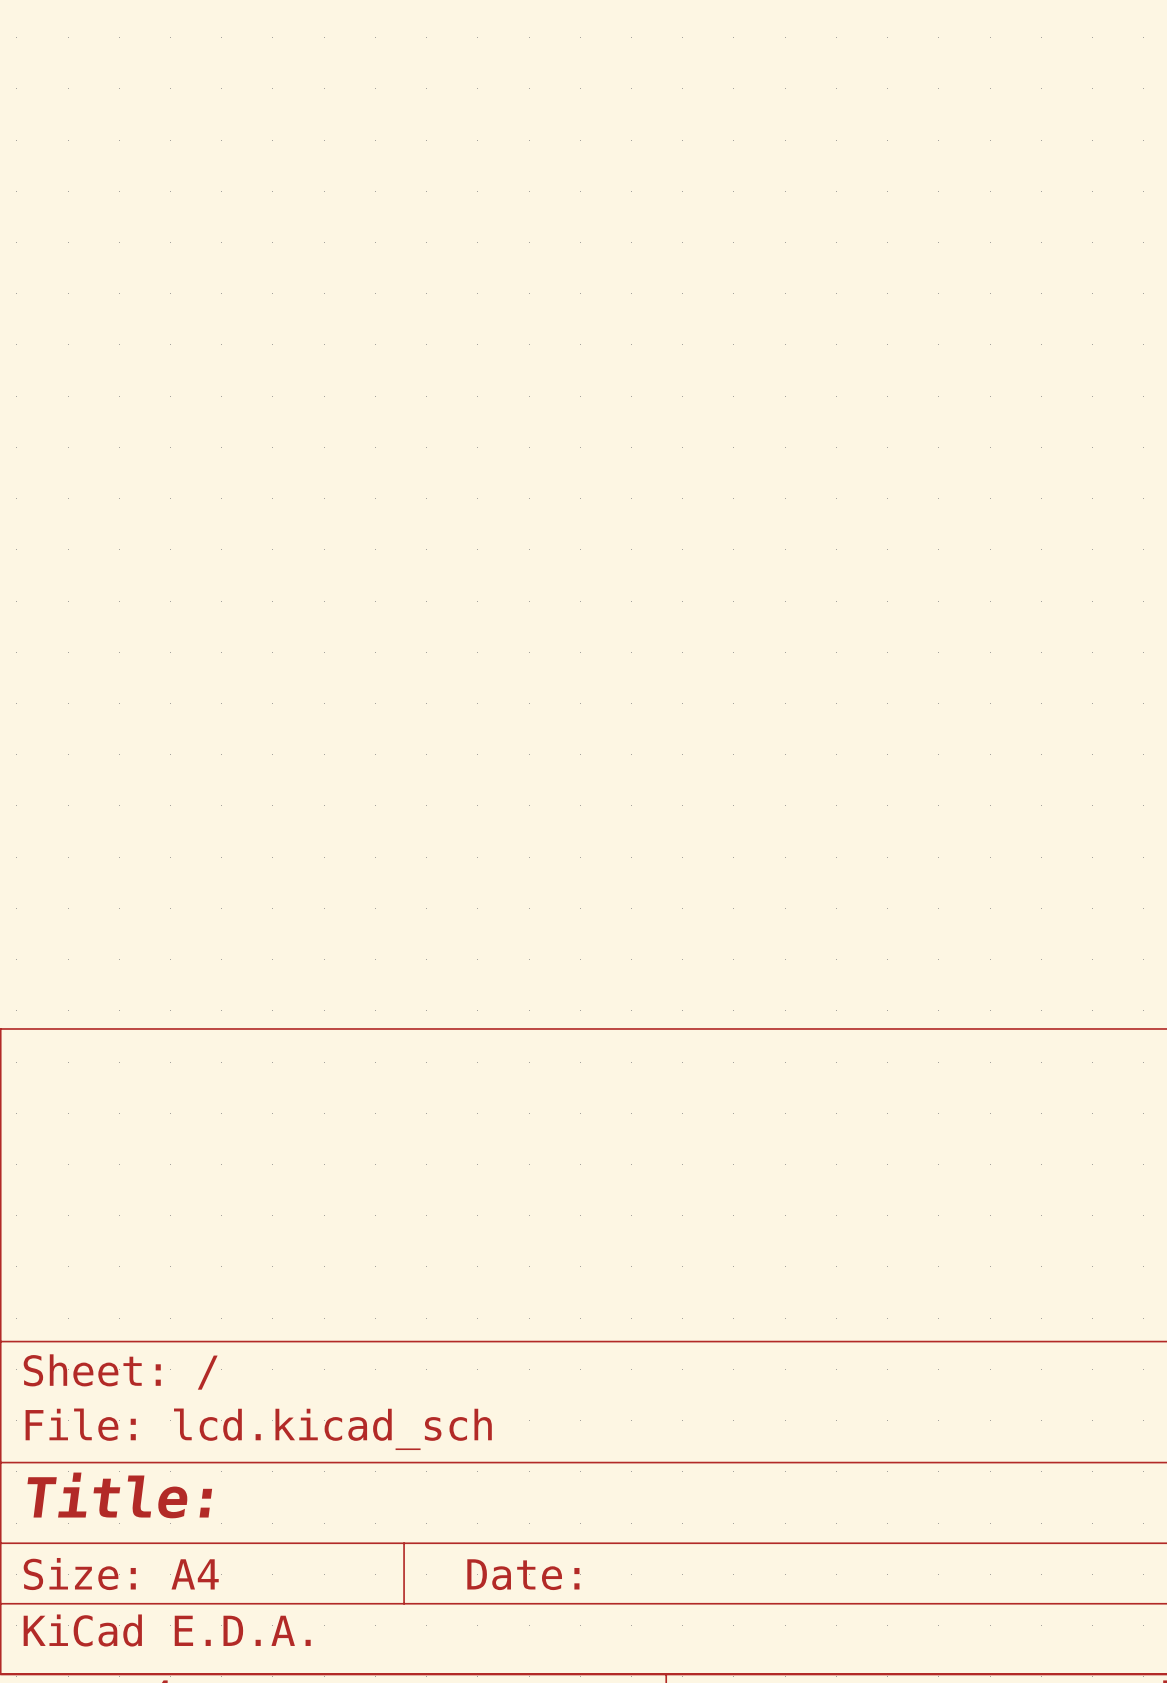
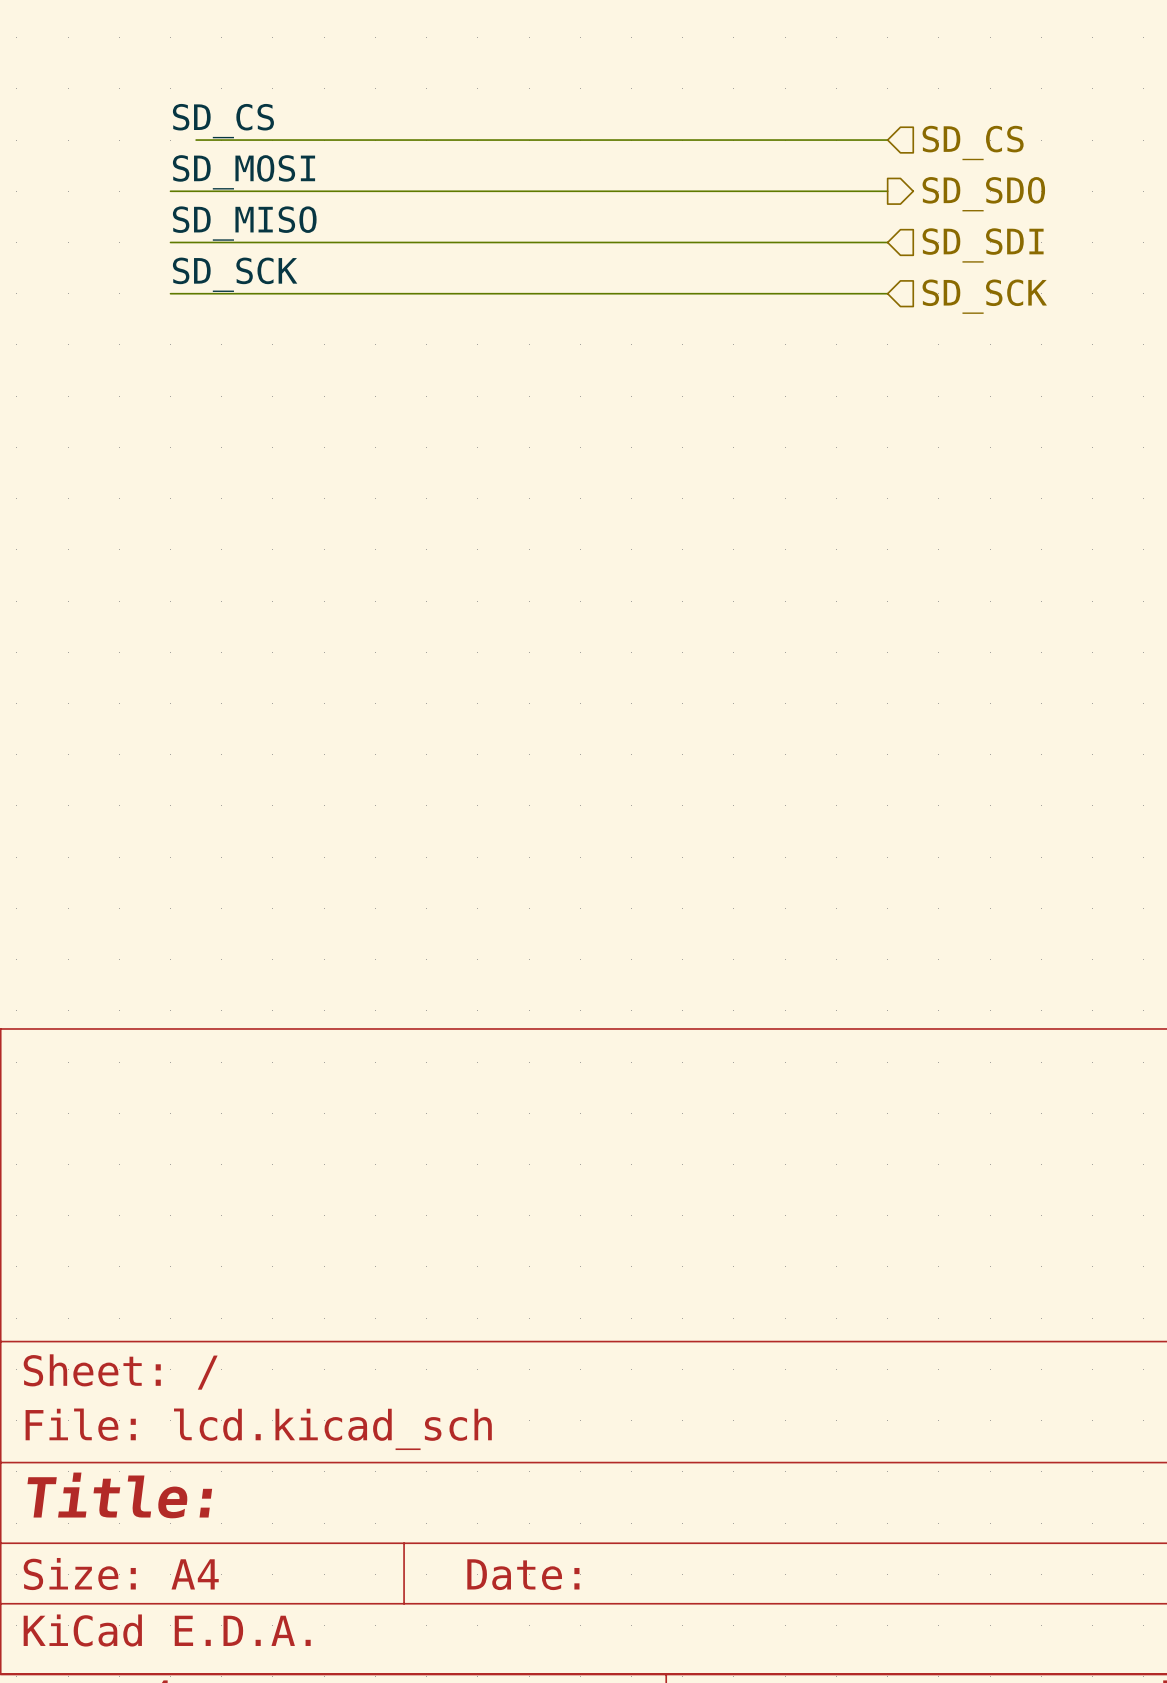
label: none -> SD_CS (223, 121)
wire: none -> (196, 140) (887, 140)
hierarchical label: none -> SD_CS (973, 142)
label: none -> SD_MOSI (243, 172)
wire: none -> (170, 191) (887, 191)
hierarchical label: none -> SD_SDO (983, 194)
label: none -> SD_MISO (244, 223)
wire: none -> (170, 242) (887, 242)
hierarchical label: none -> SD_SDI (983, 245)
label: none -> SD_SCK (235, 274)
wire: none -> (170, 293) (887, 293)
hierarchical label: none -> SD_SCK (984, 296)

